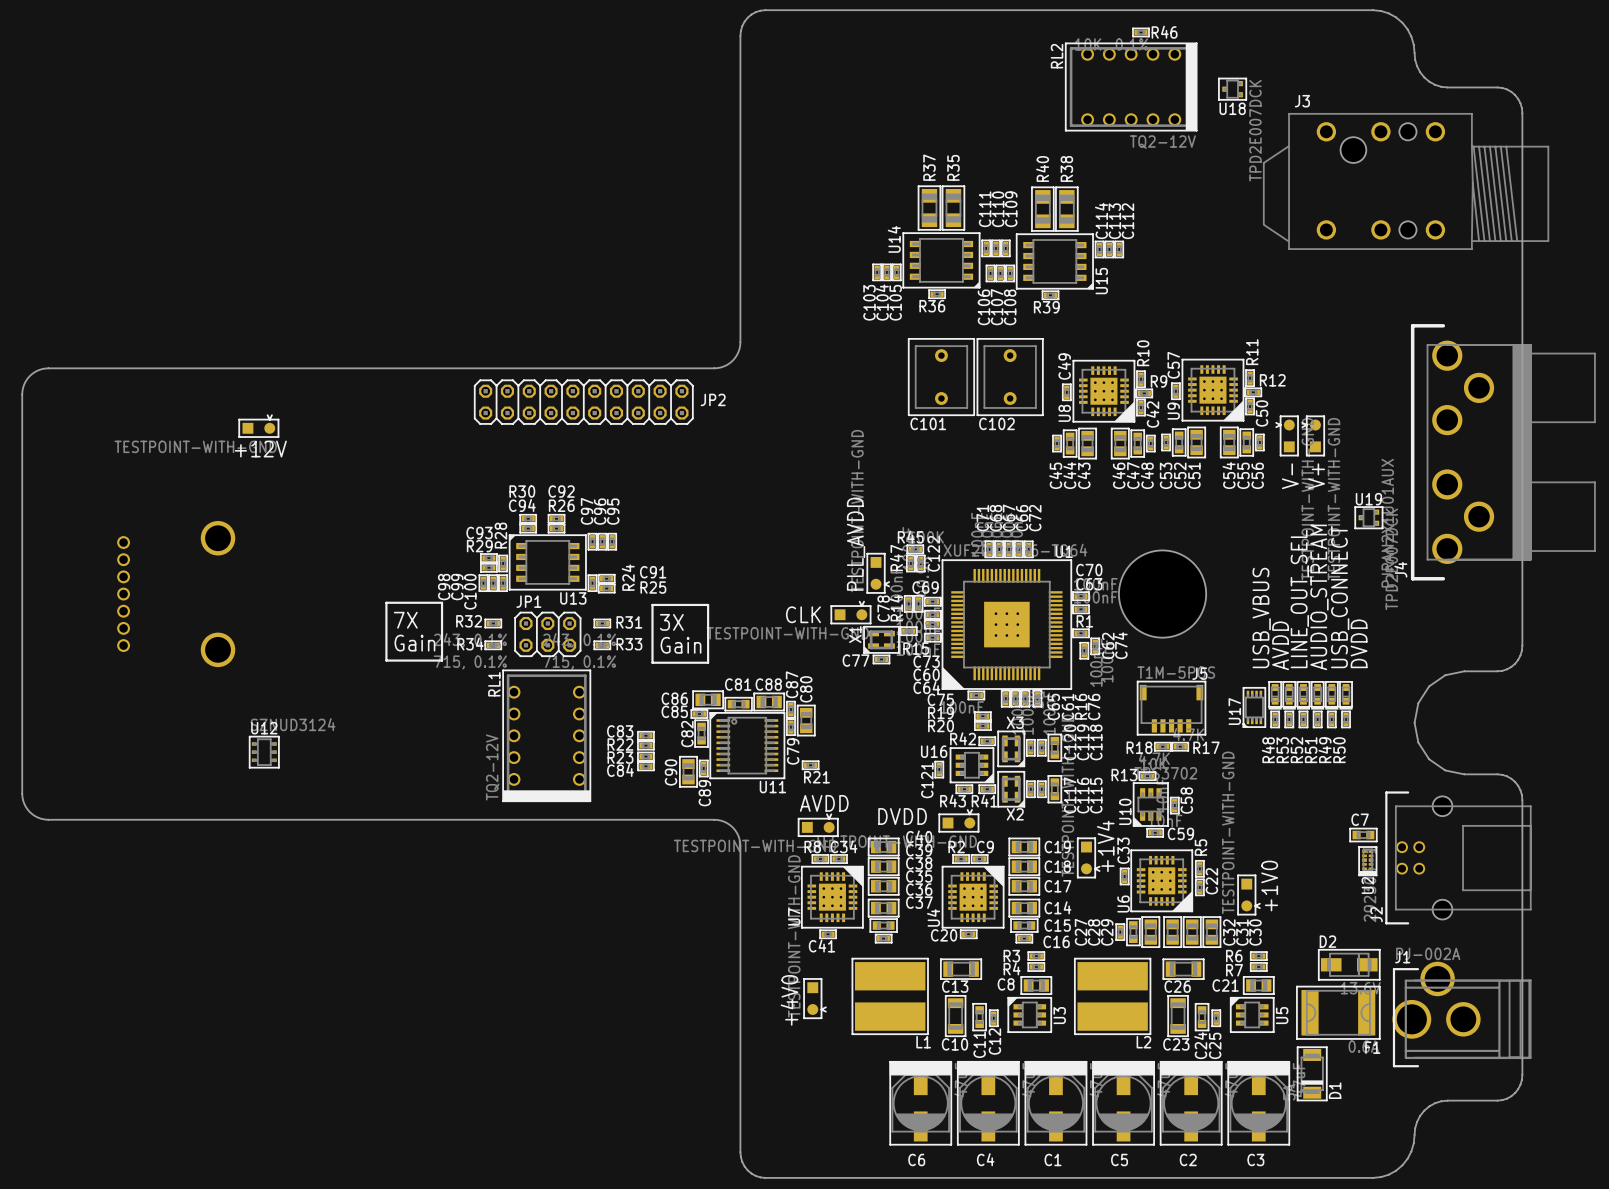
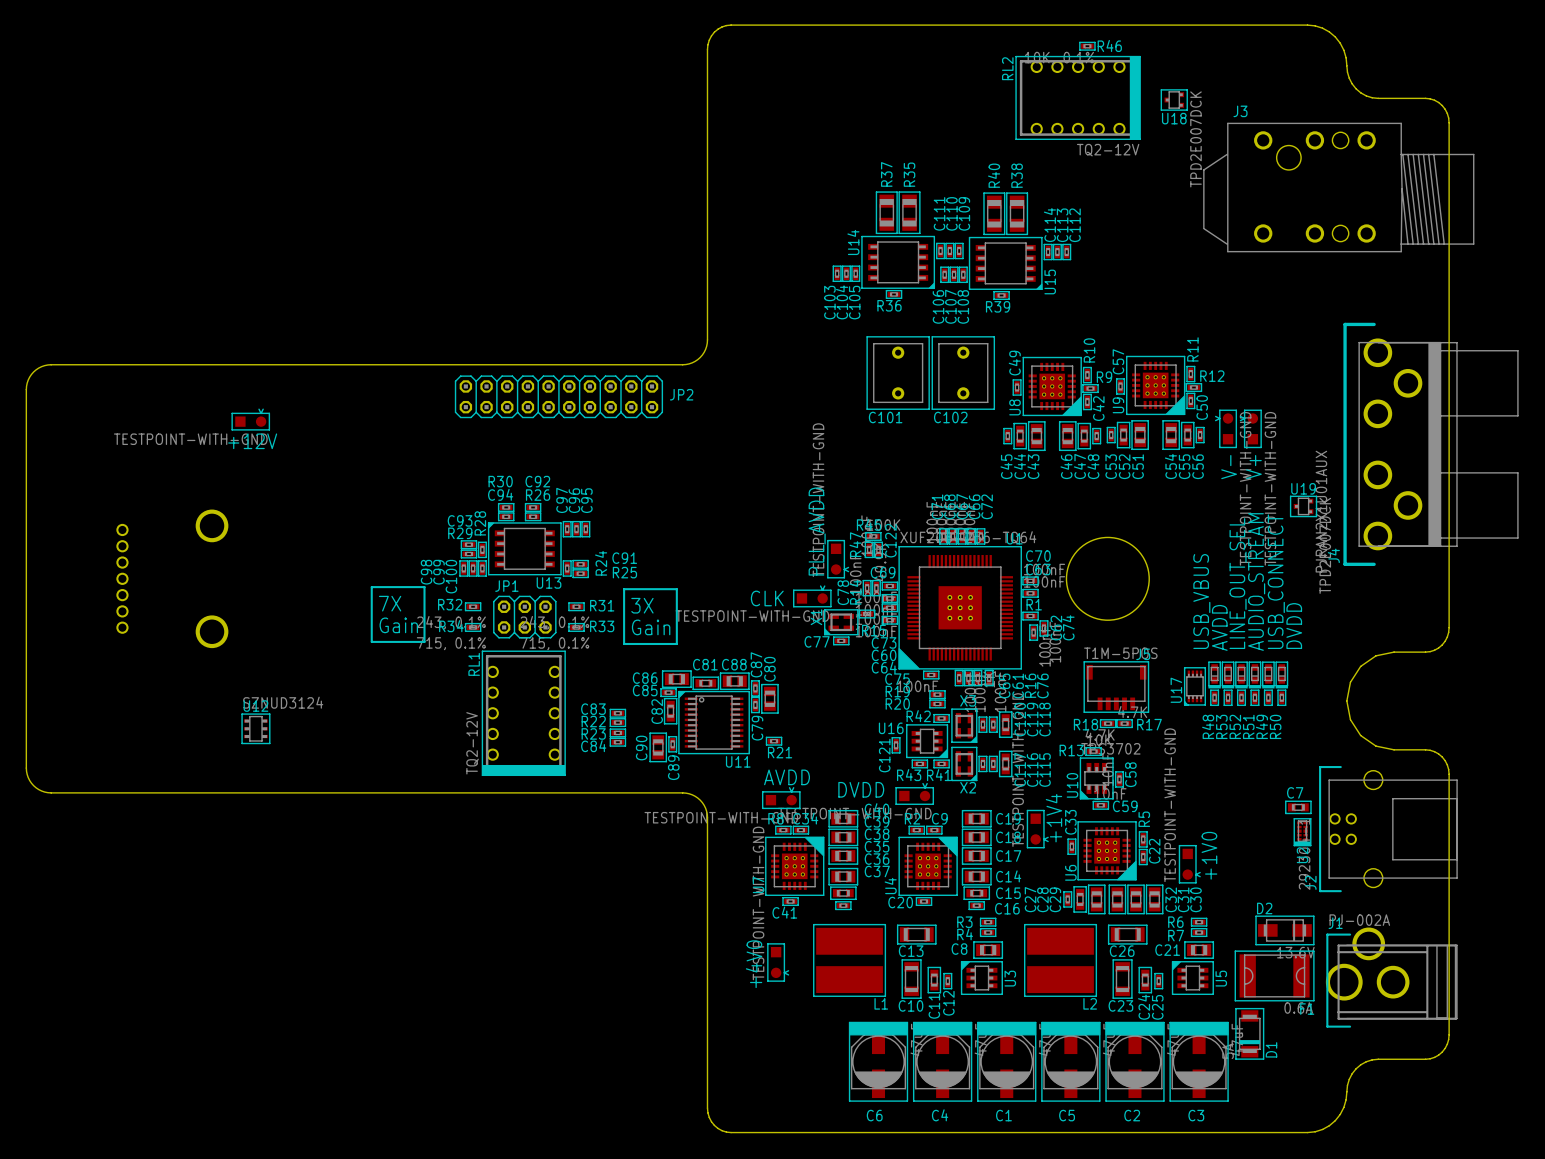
J4 footprint: [1410, 324, 1596, 581] -> [1343, 322, 1519, 566]

